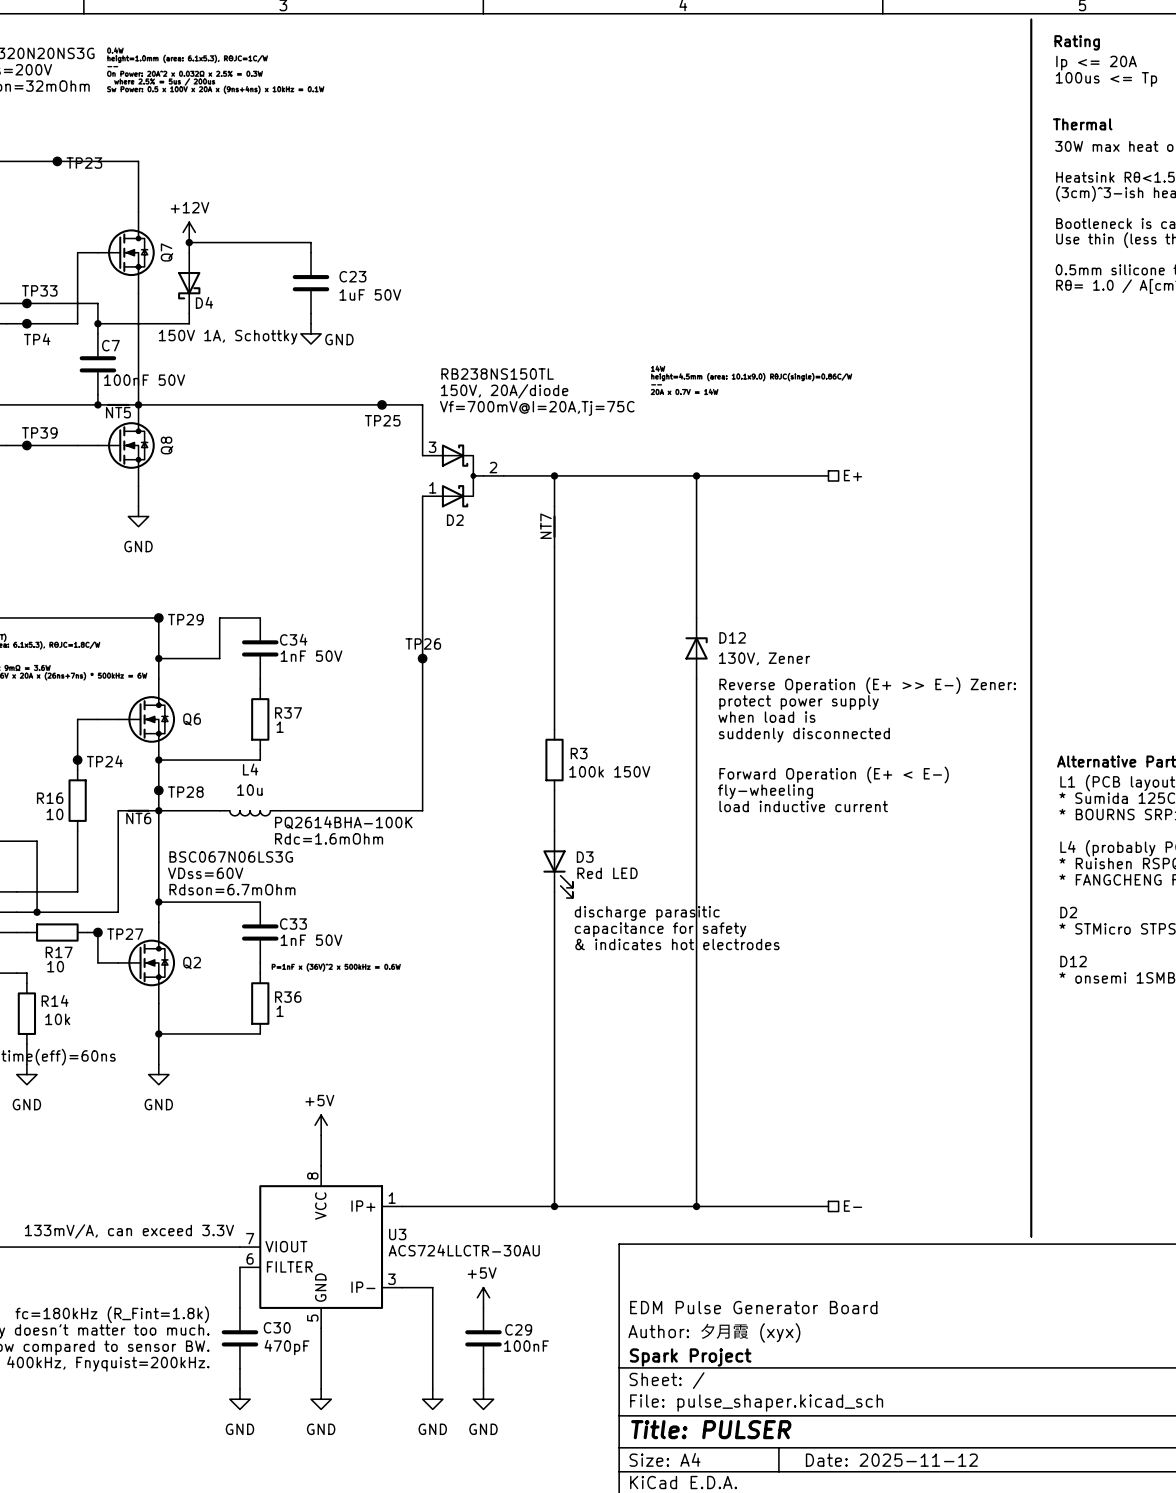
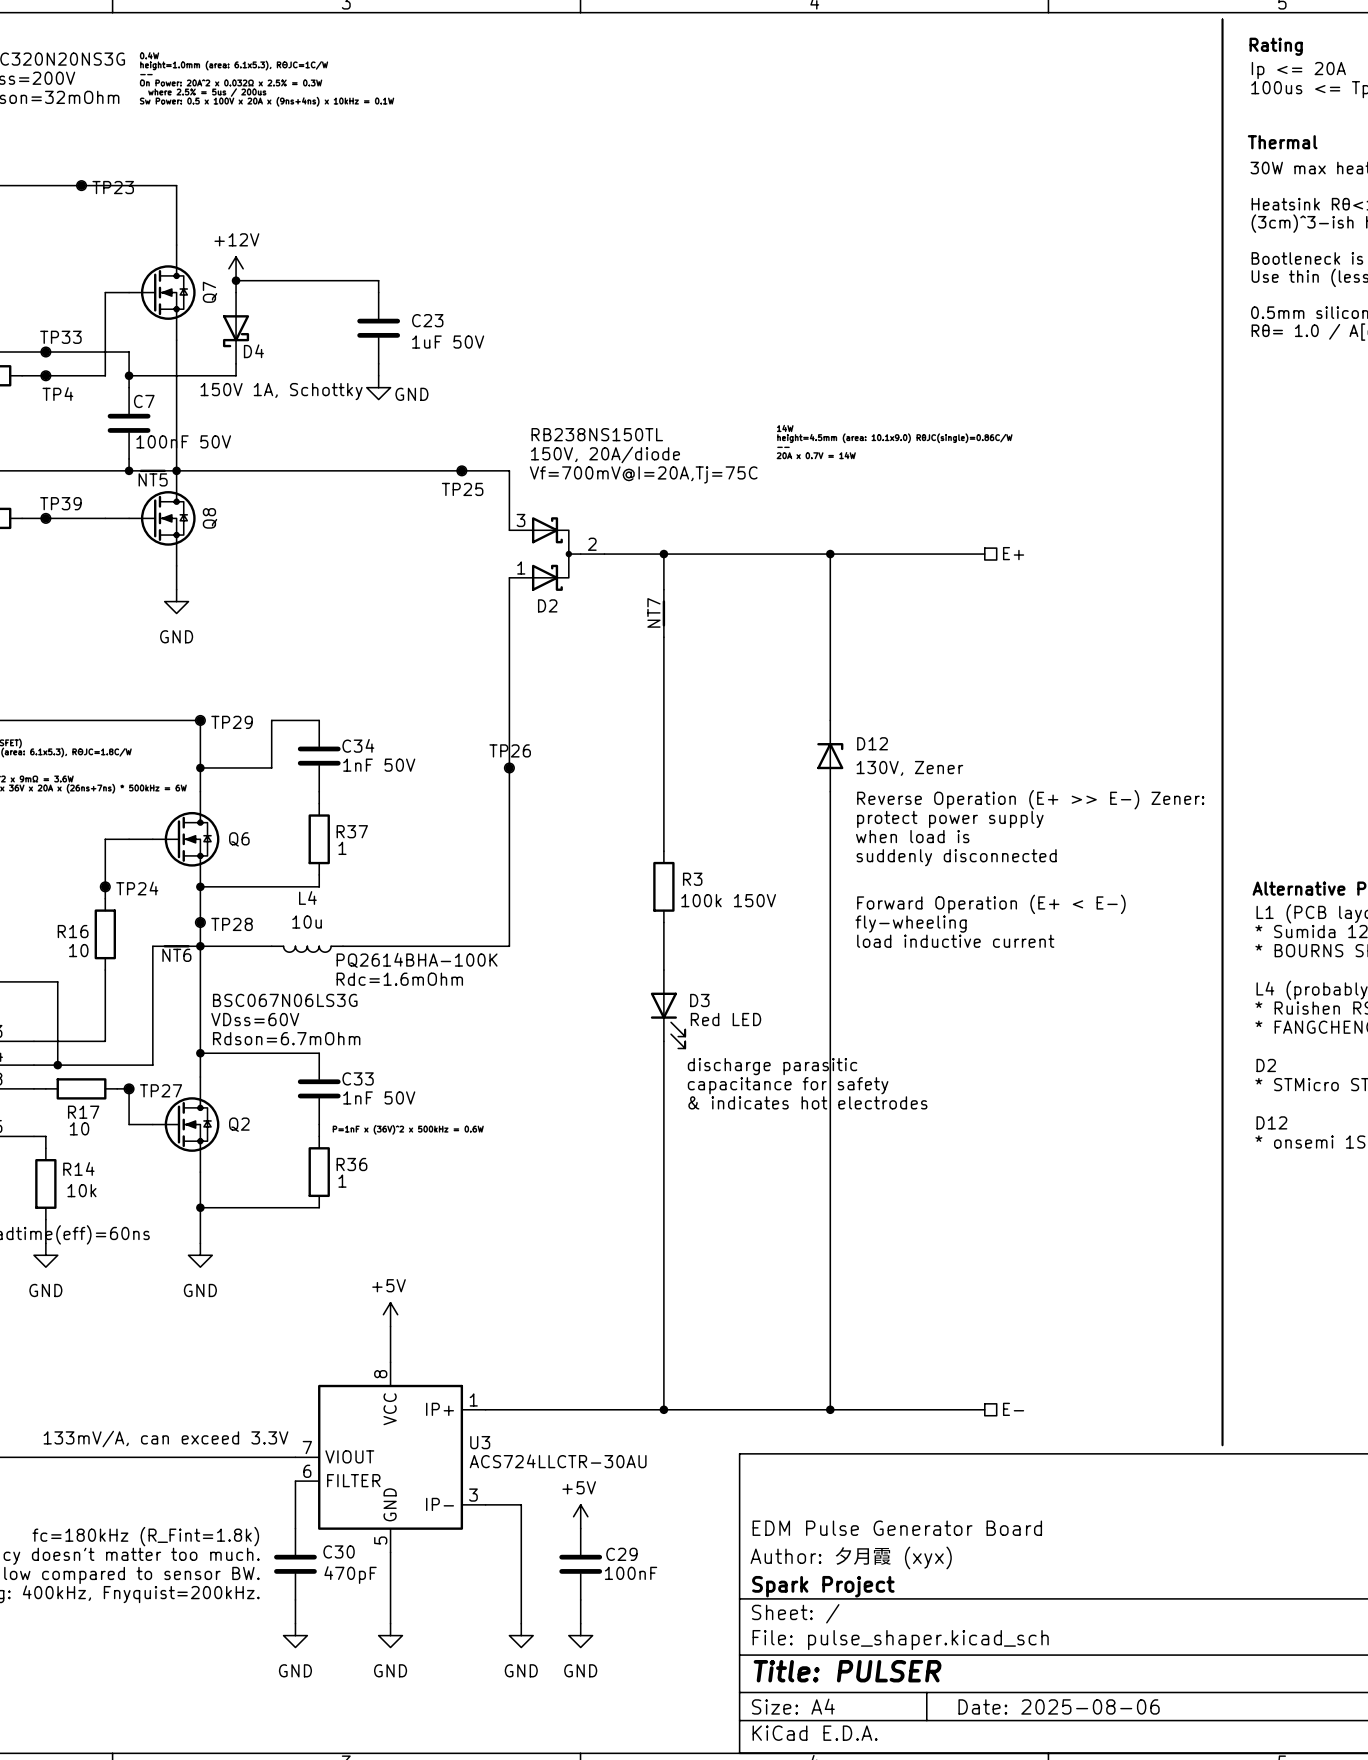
title block: Date: 2025-11-12 (891, 1460) -> Date: 2025-08-06 (1059, 1706)

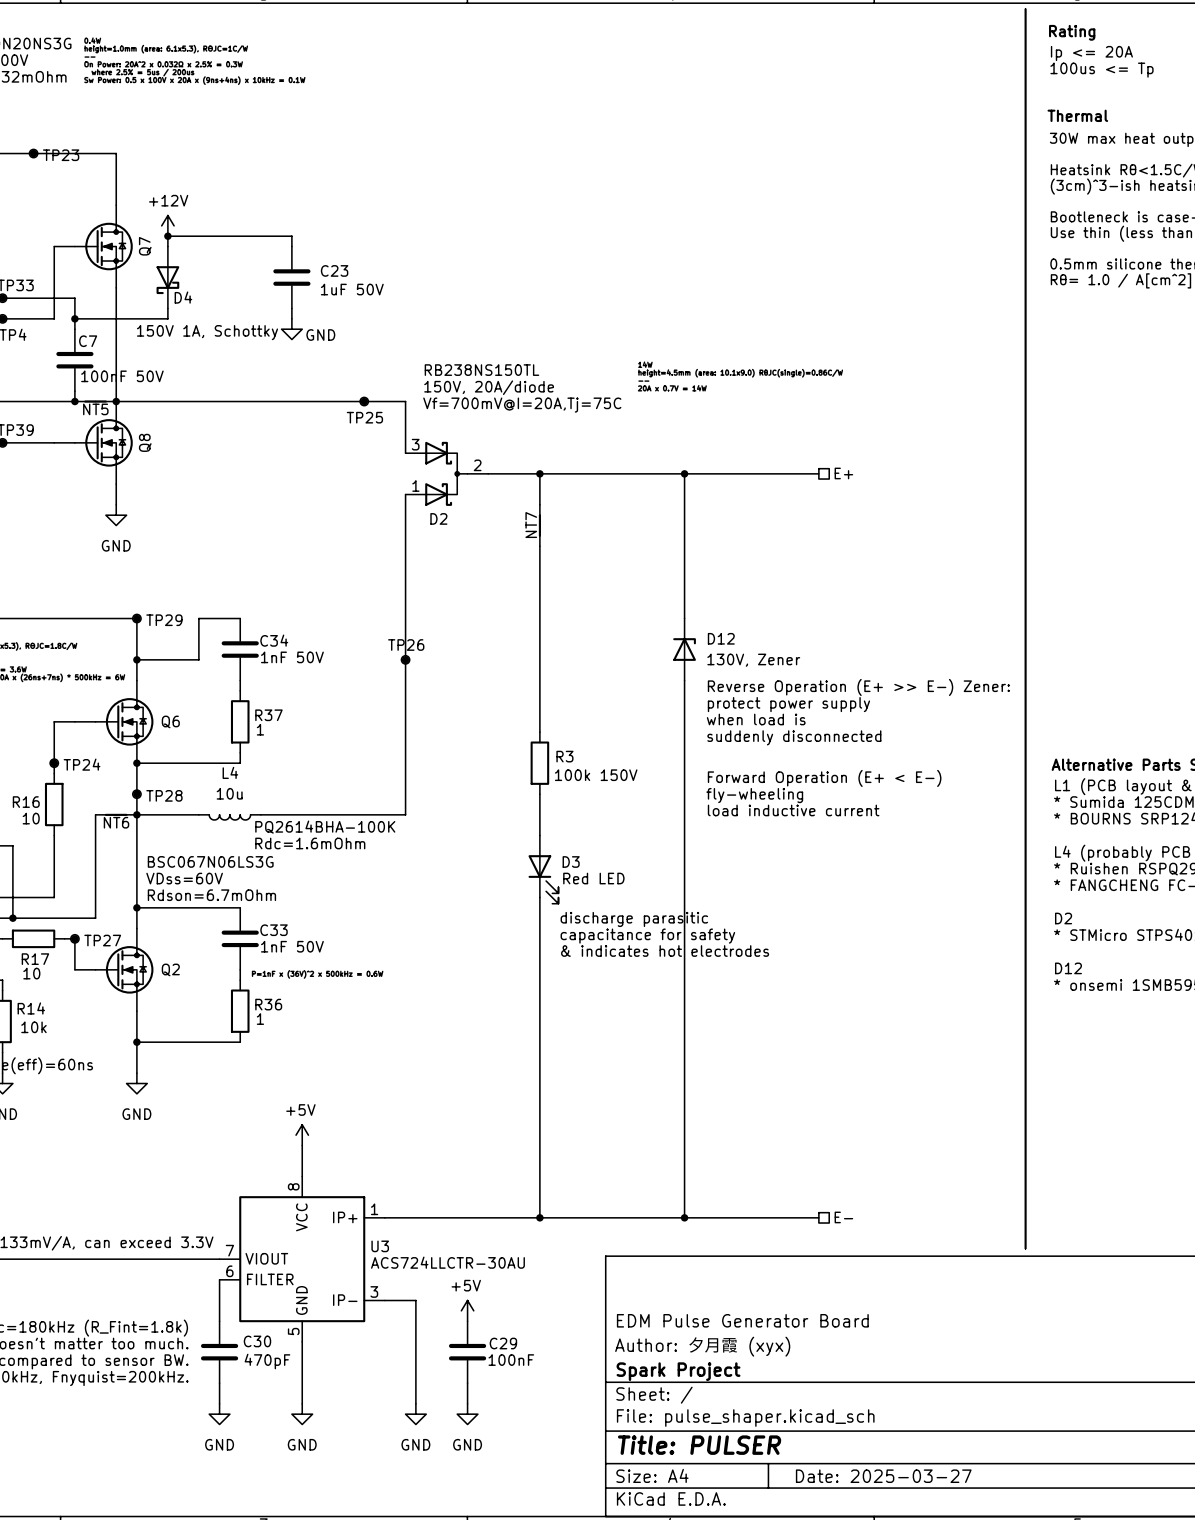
title block: Date: 2025-08-06 (1059, 1706) -> Date: 2025-03-27 (883, 1476)

